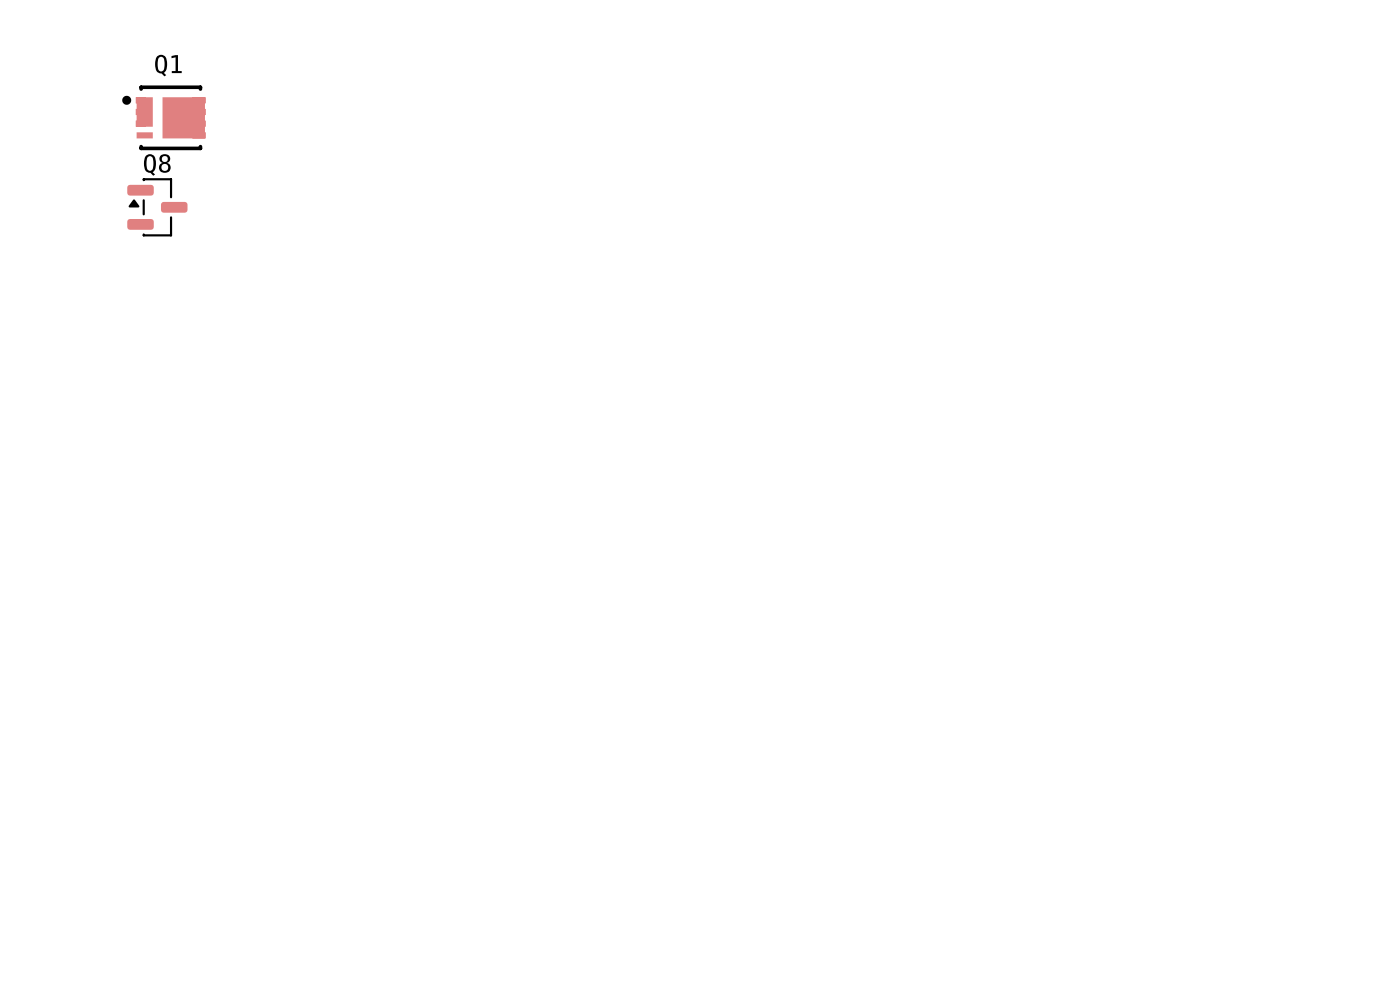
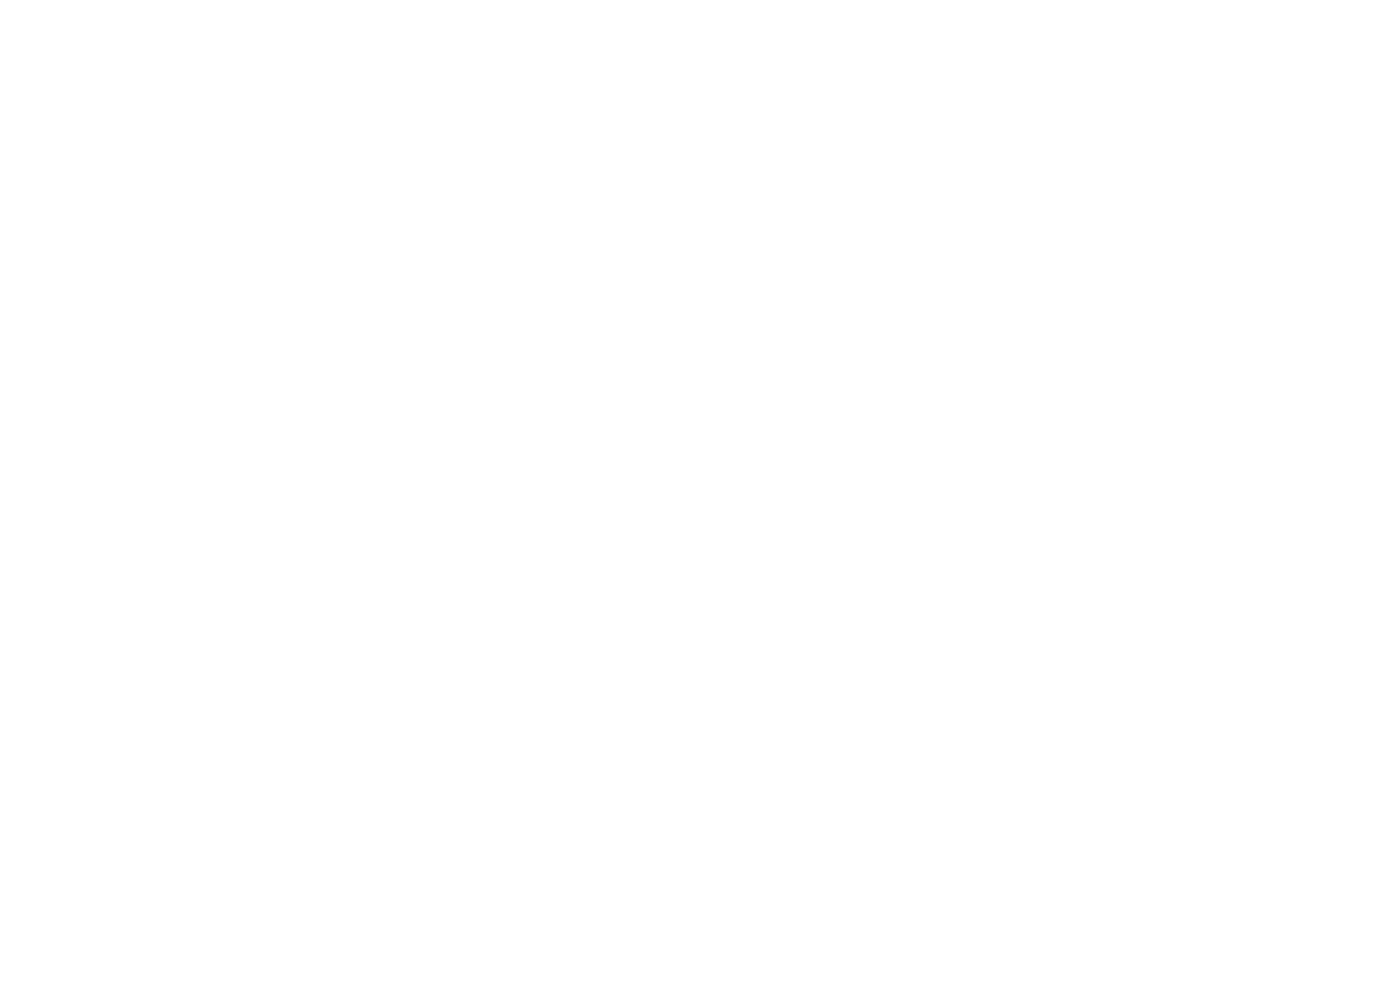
Q1: (164, 117) -> none
Q8: (157, 207) -> none

